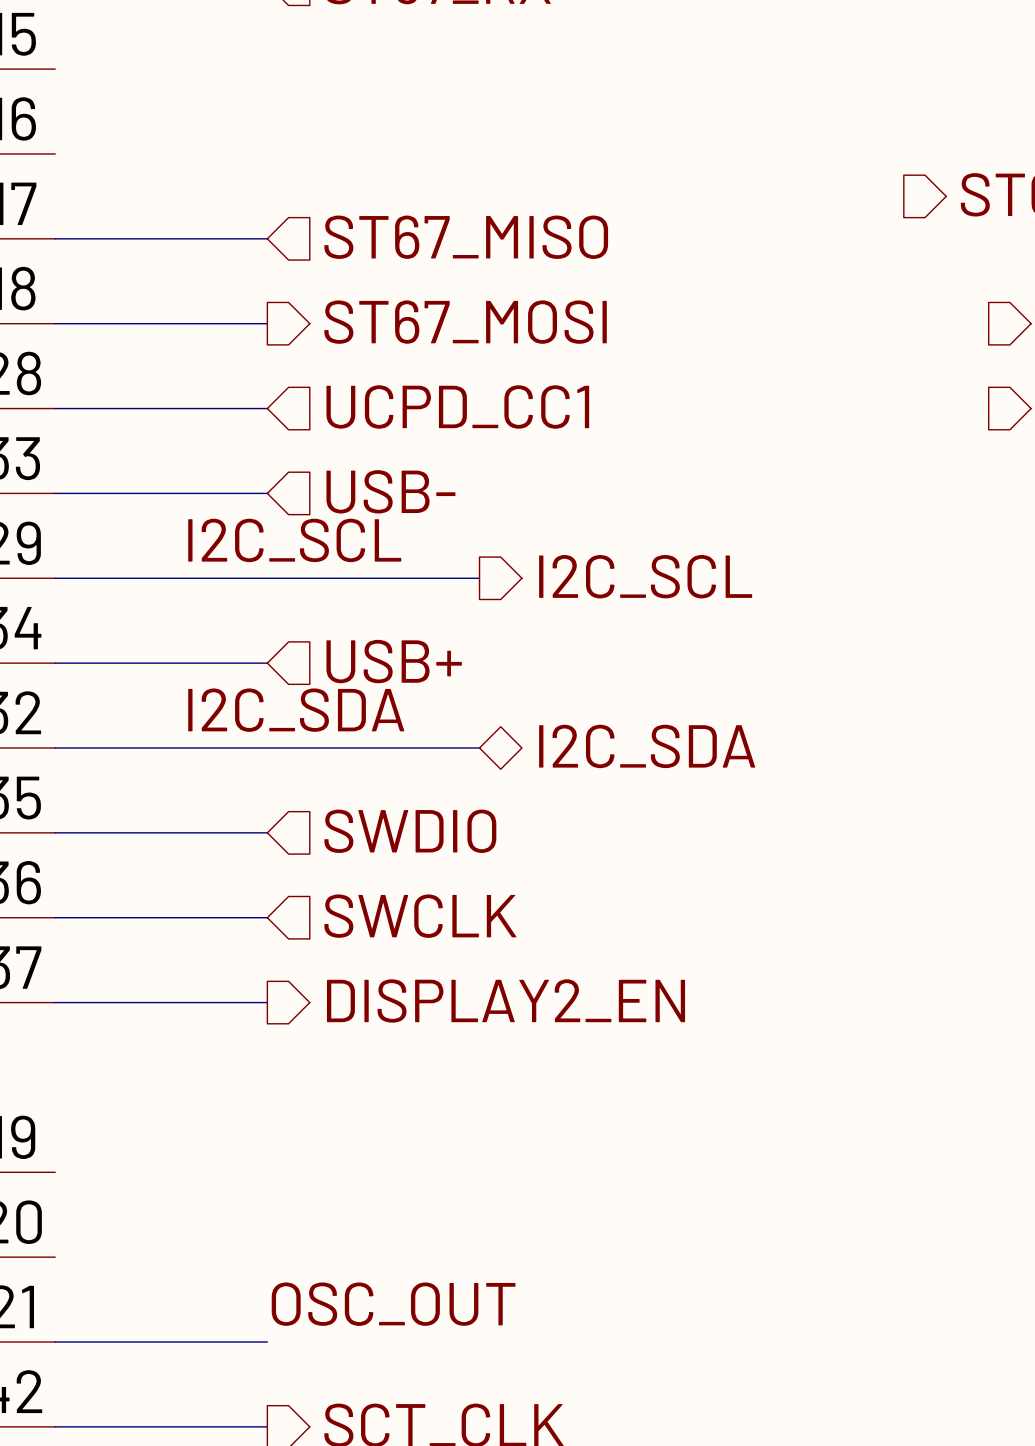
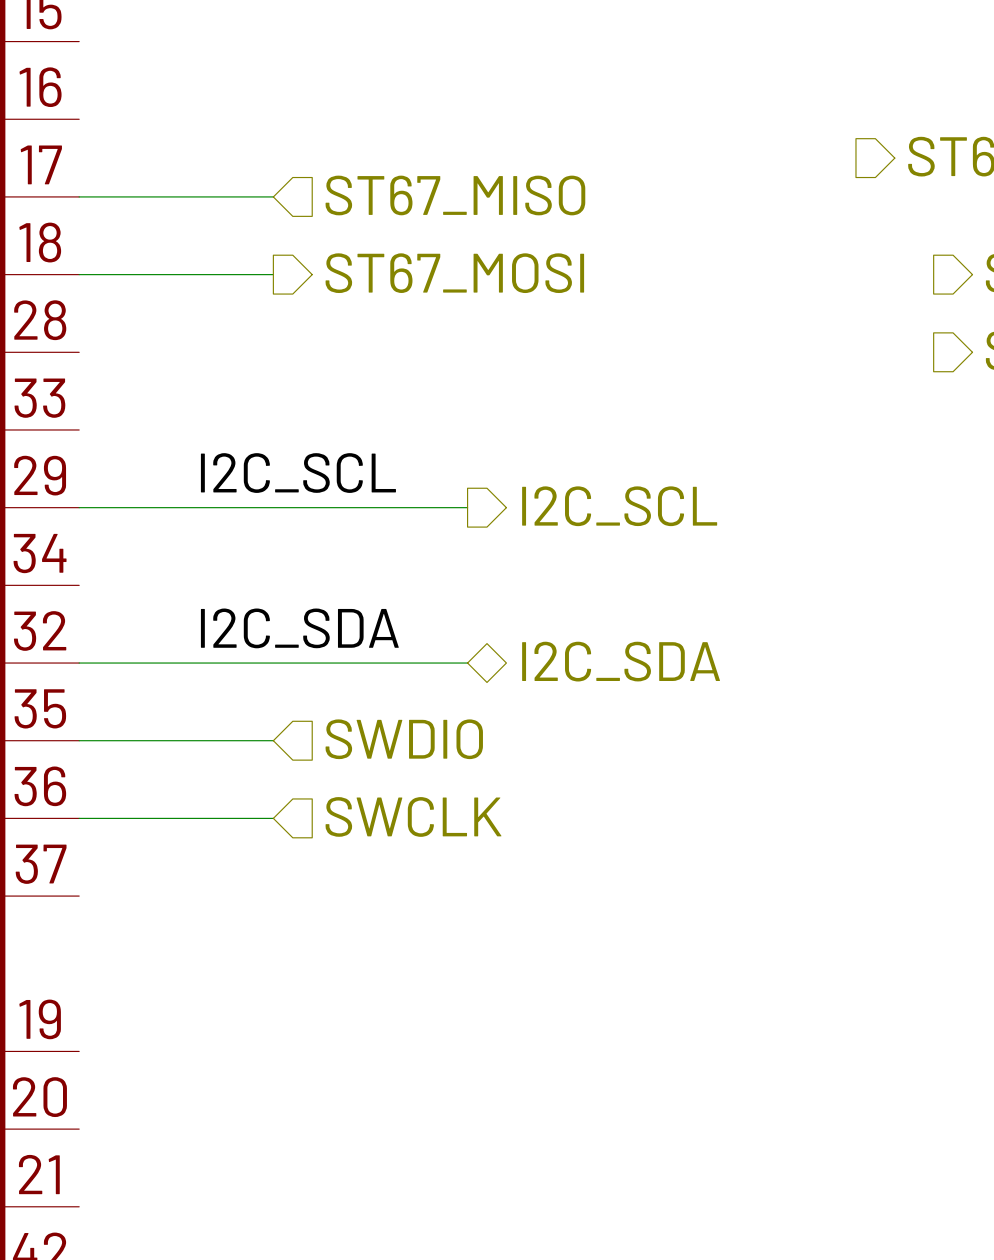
hierarchical label: UCPD_CC1 (457, 407) -> none
wire: (55, 408) (267, 408) -> none
hierarchical label: USB- (390, 491) -> none
wire: (55, 493) (267, 493) -> none
hierarchical label: USB+ (394, 661) -> none
wire: (55, 663) (267, 663) -> none
hierarchical label: DISPLAY2_EN (506, 1000) -> none
wire: (55, 1002) (267, 1002) -> none
label: OSC_OUT (393, 1304) -> none
wire: (55, 1342) (267, 1342) -> none

